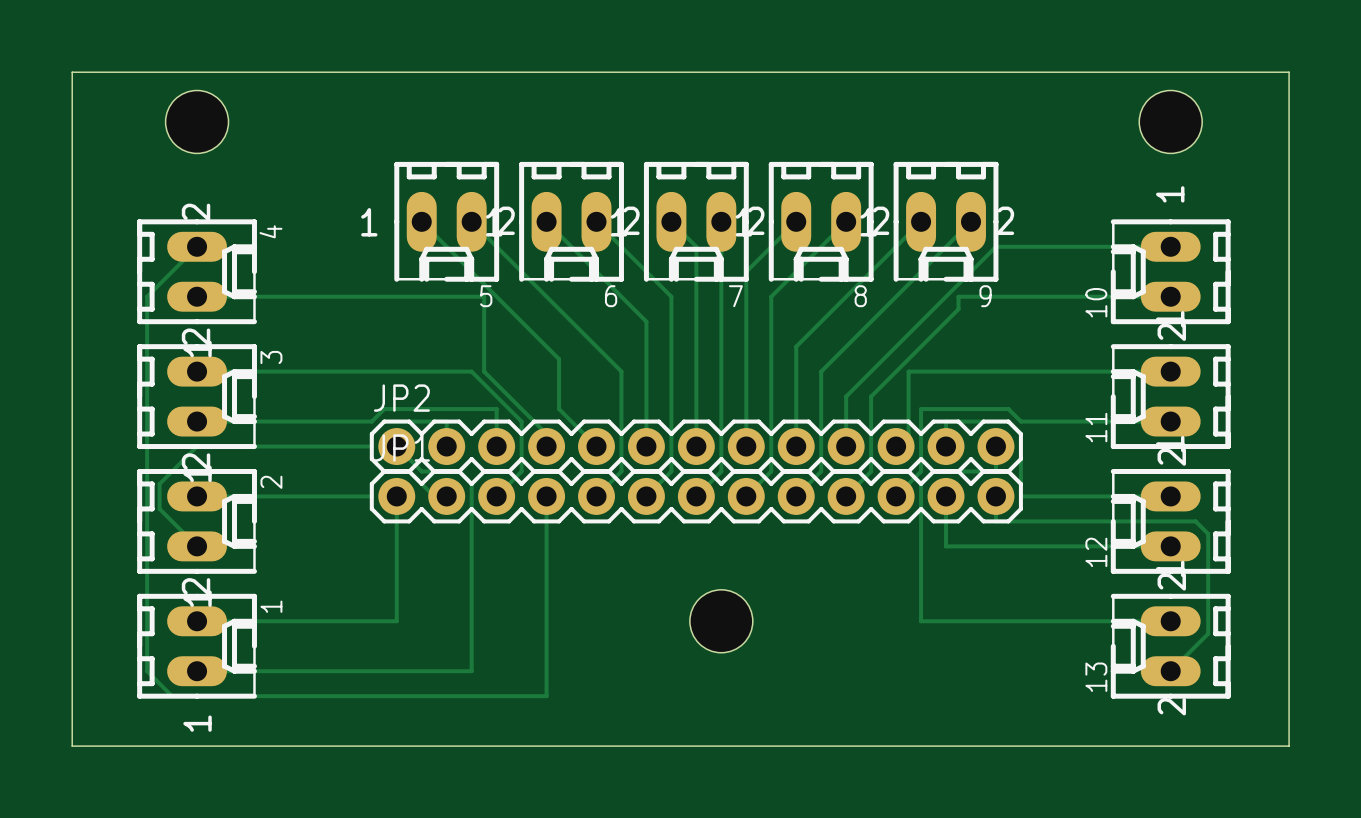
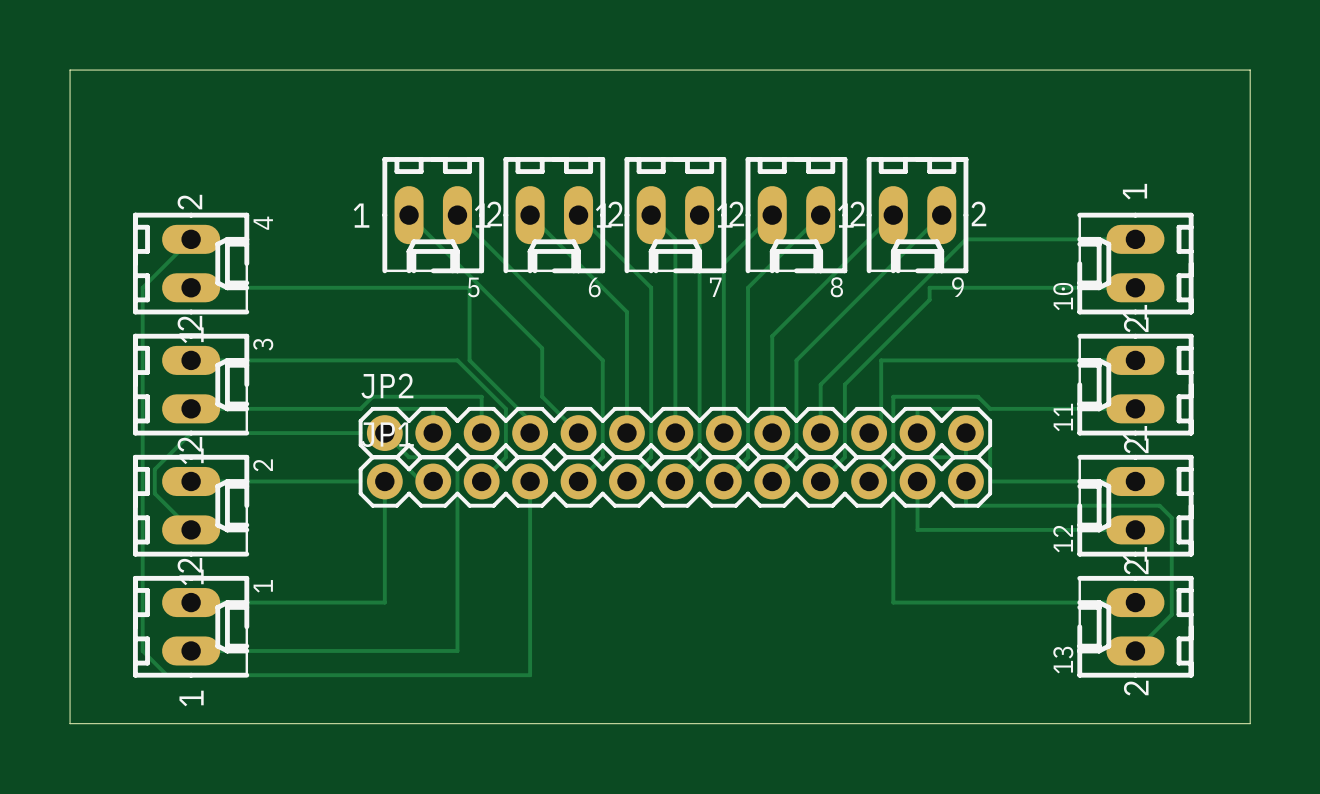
hole: (197, 121) -> none
hole: (1170, 121) -> none
hole: (721, 621) -> none

